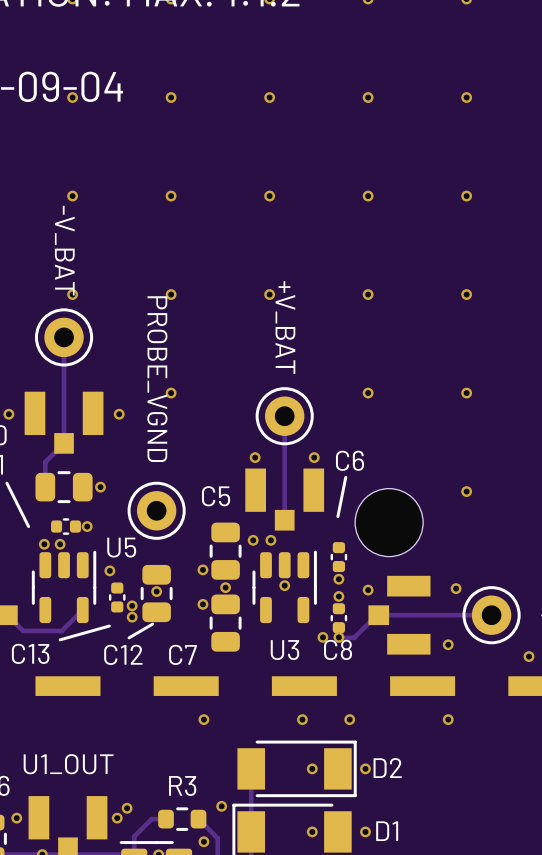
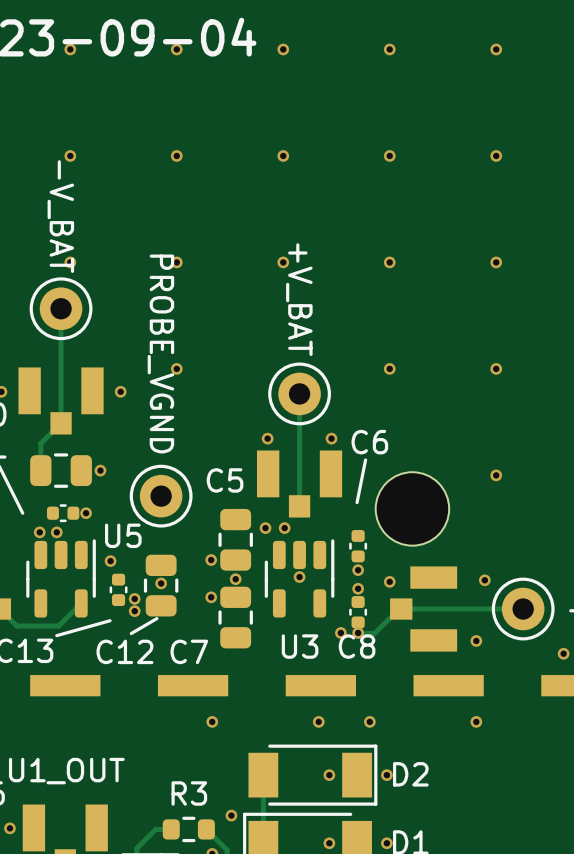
via: (127, 808) -> none
via: (117, 818) -> none

